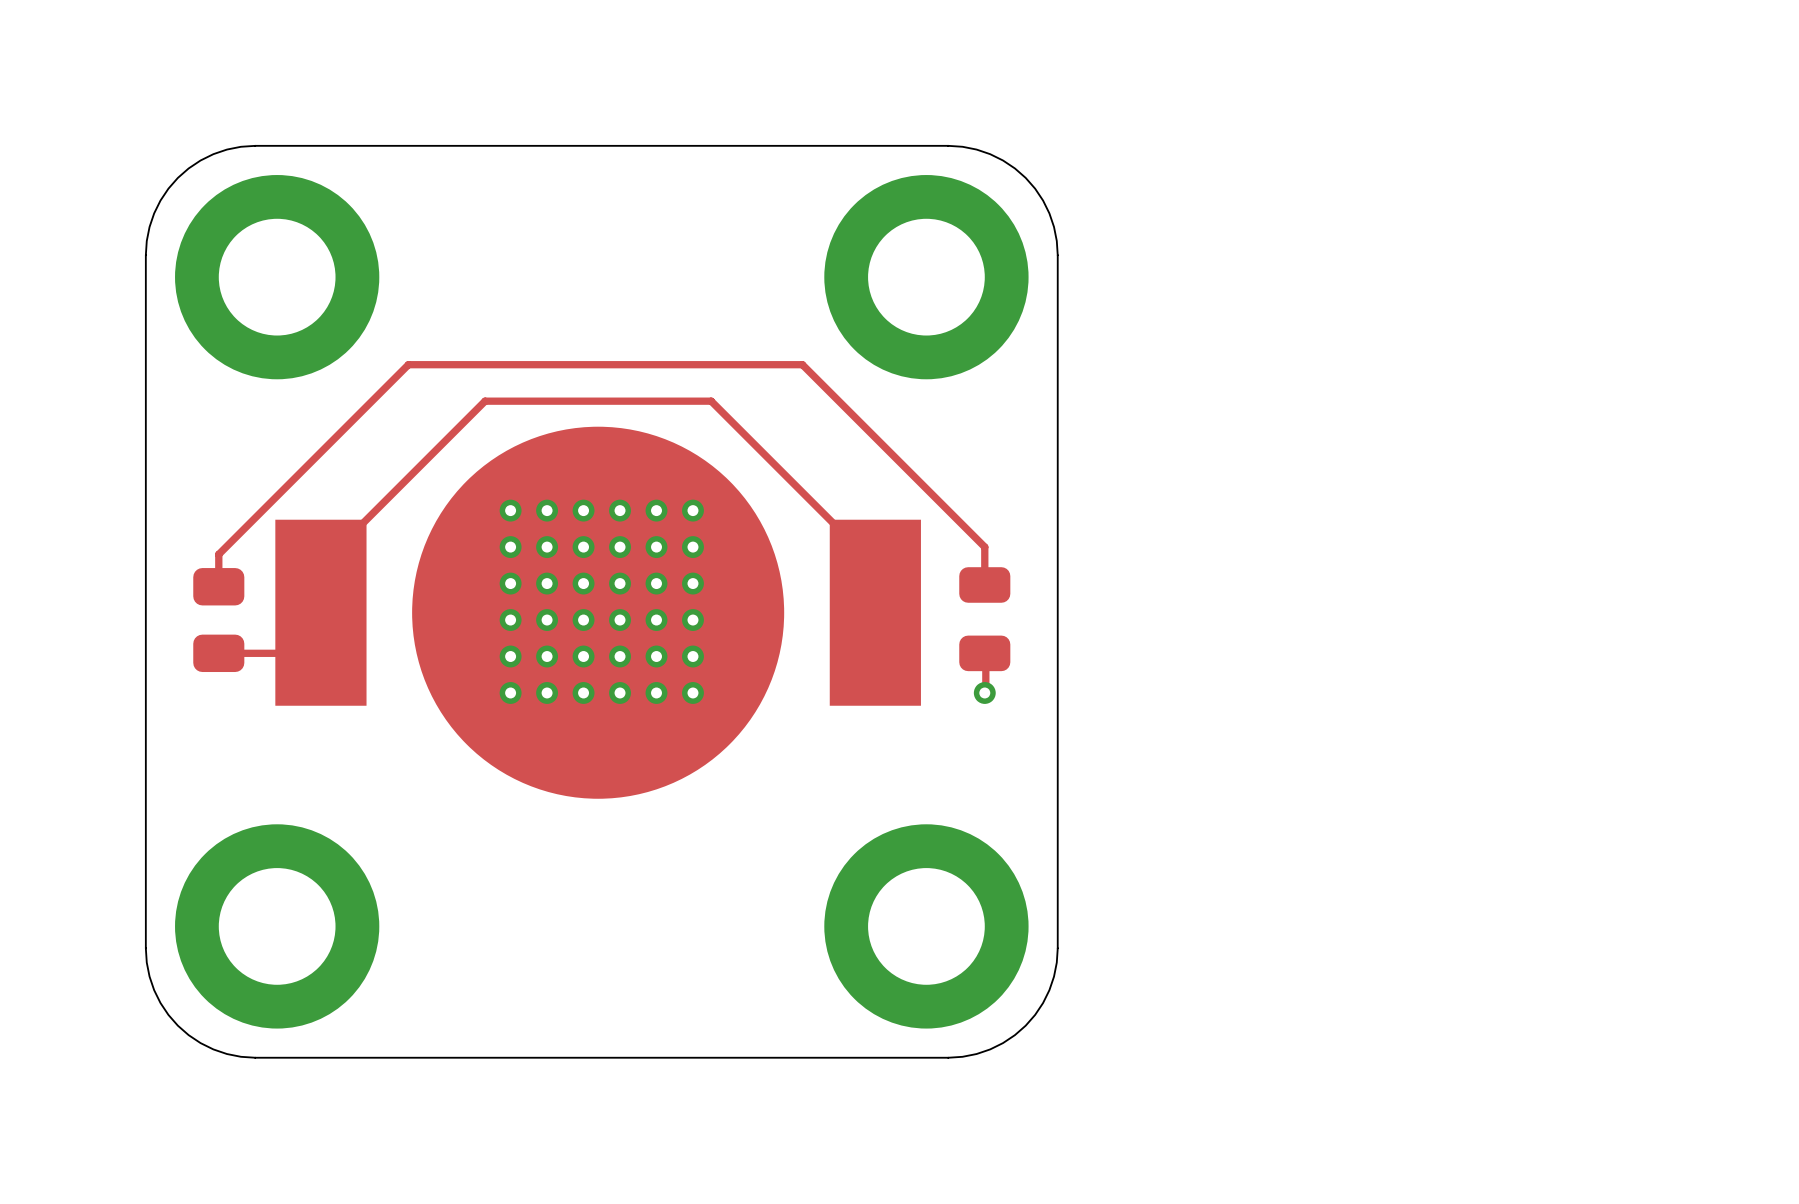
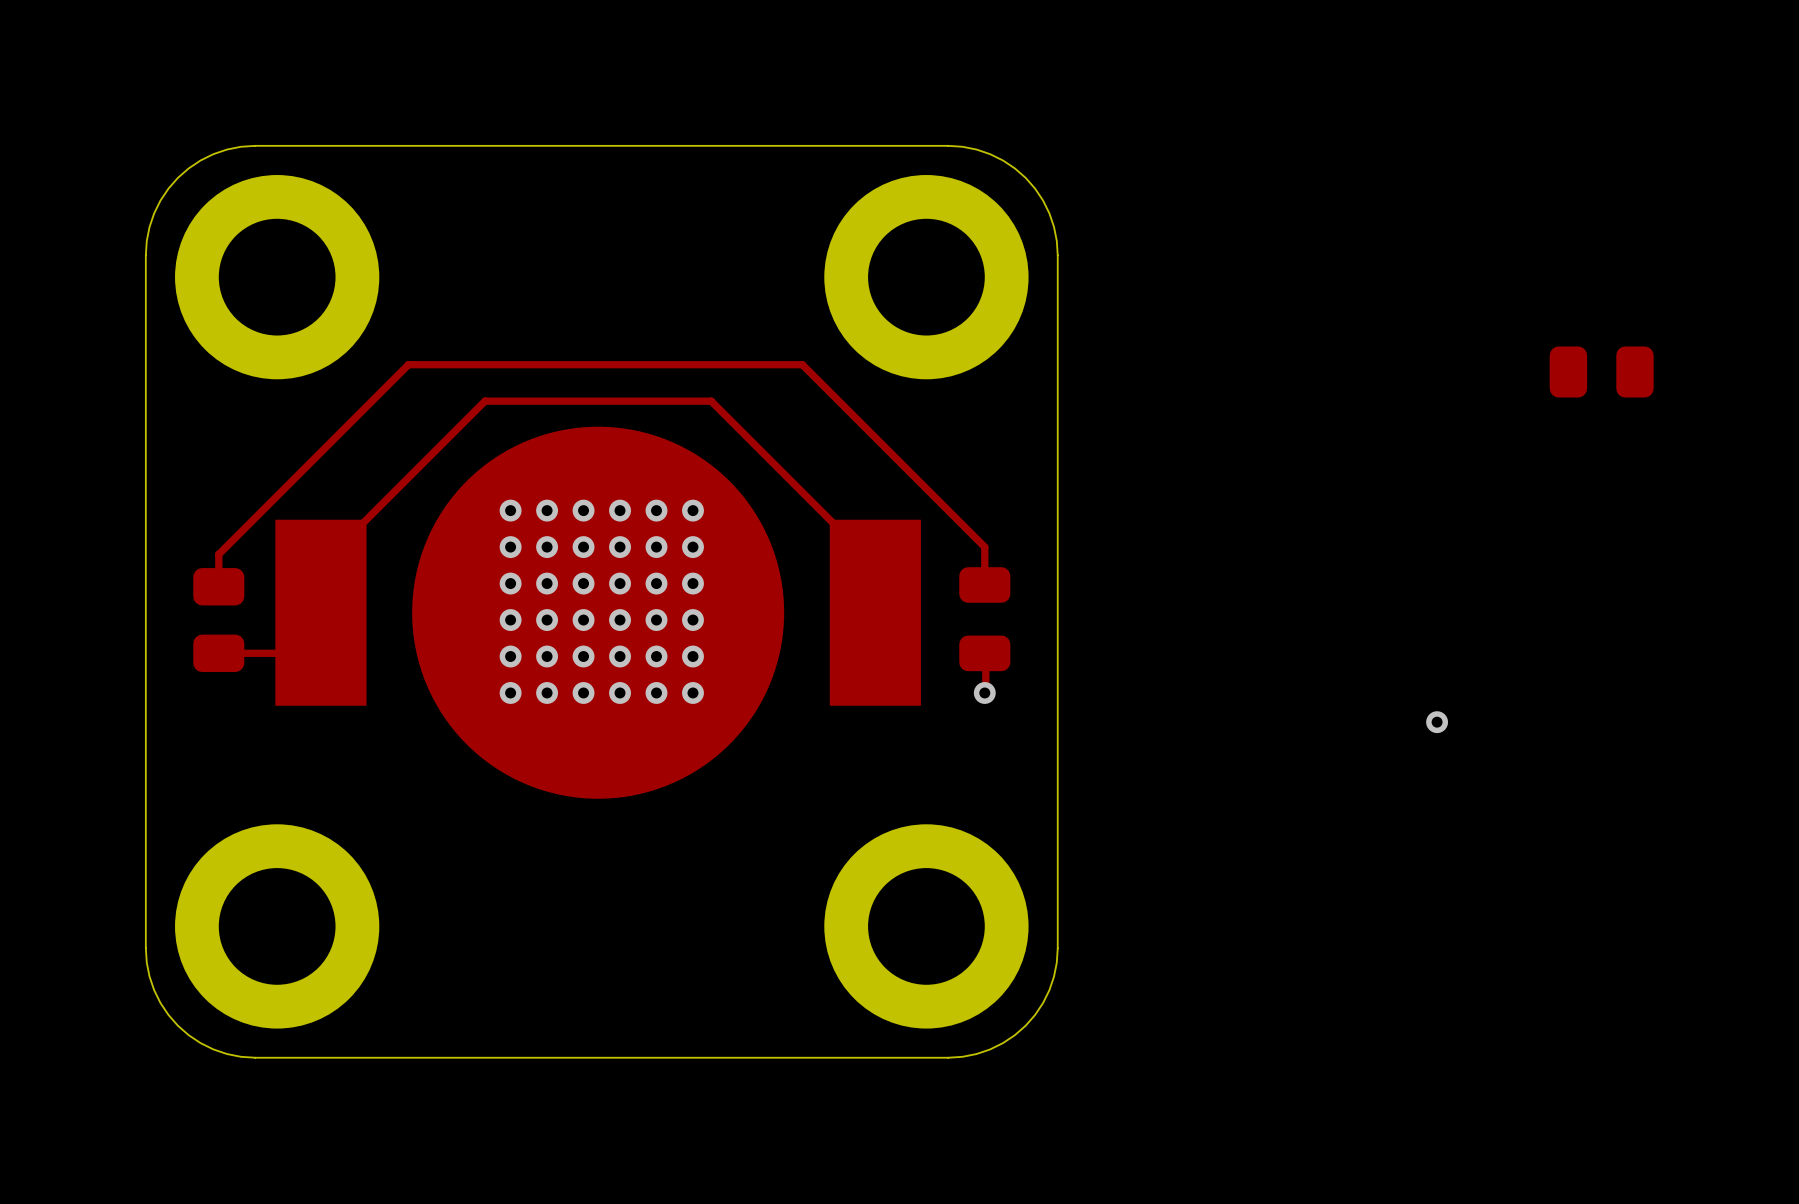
part: none -> (1601, 371)
via: none -> (1437, 722)

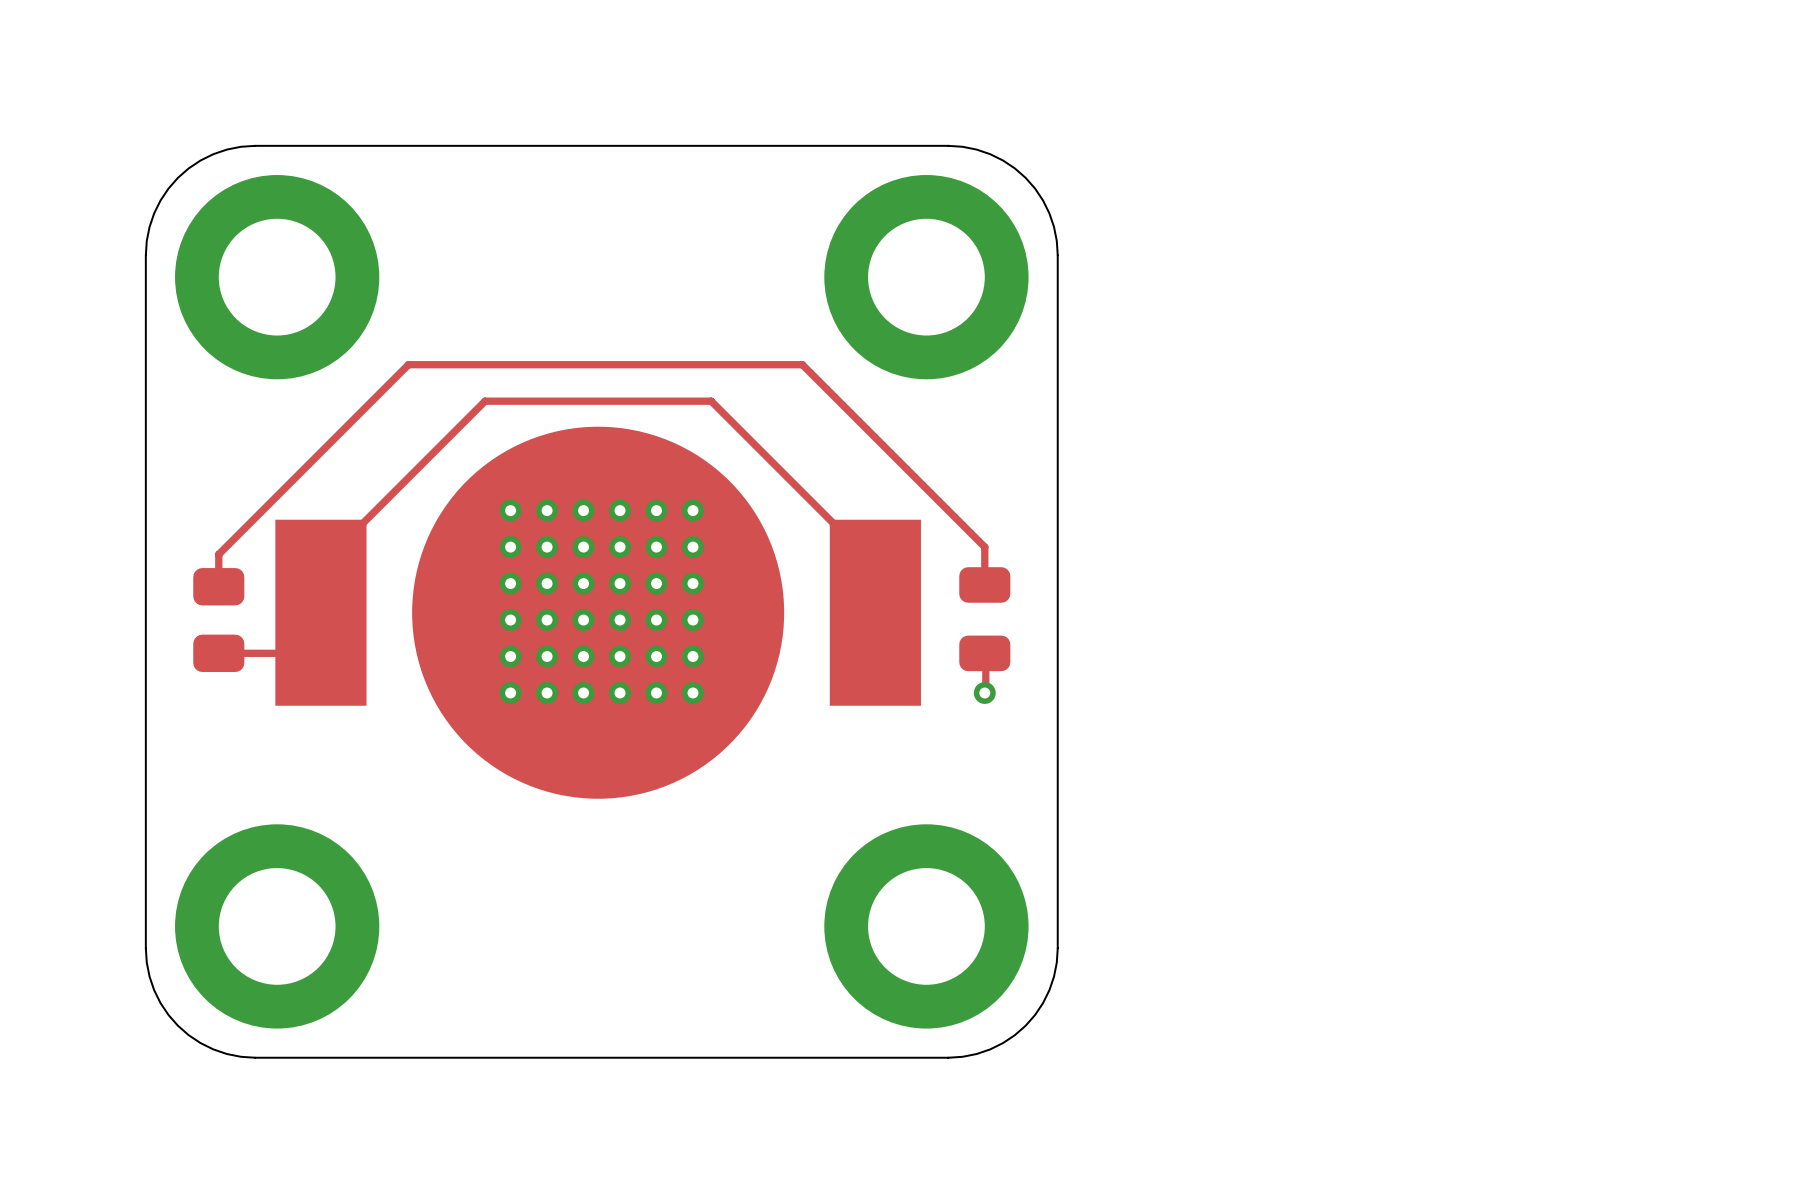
part: (1601, 371) -> none
via: (1437, 722) -> none

